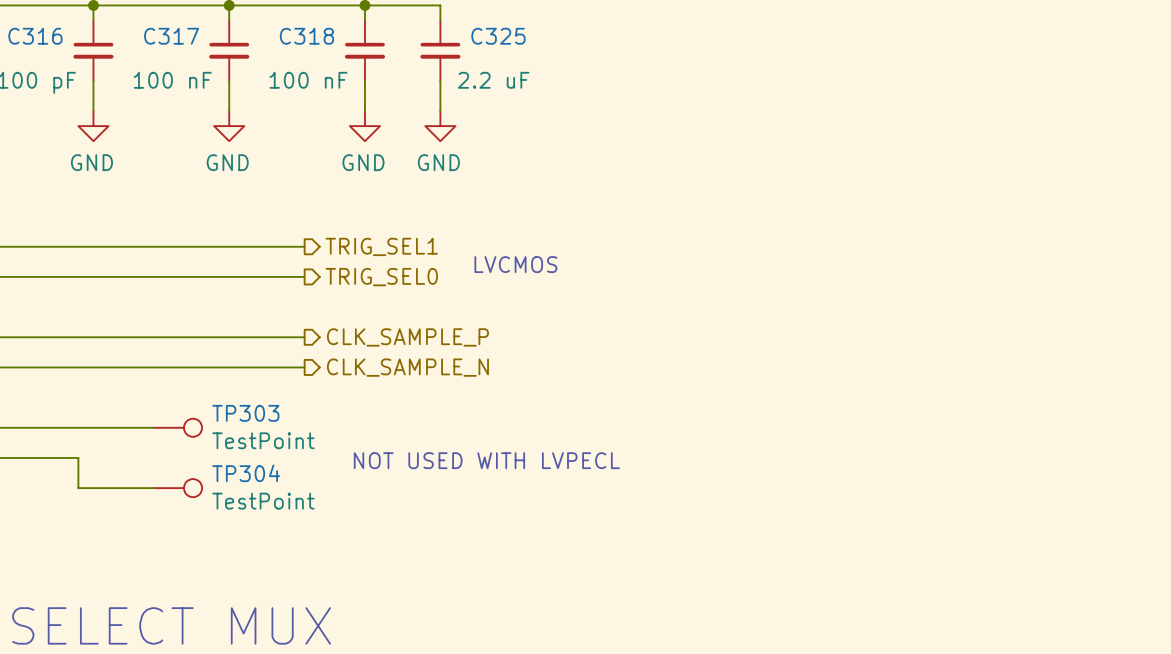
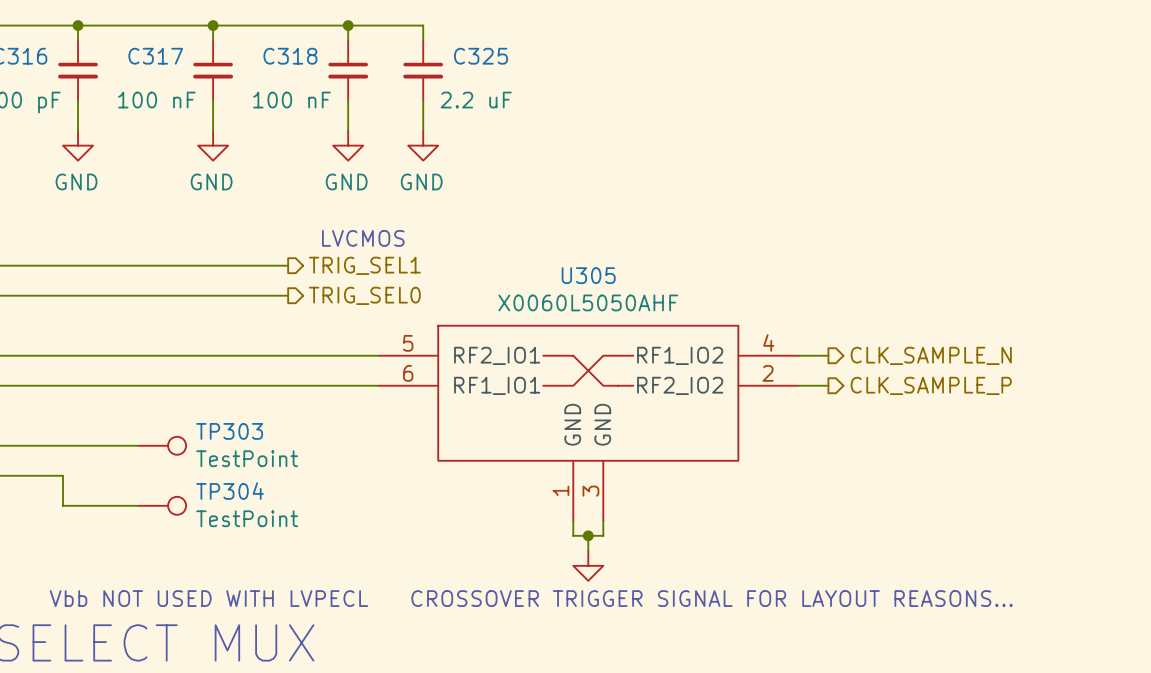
text position: LVCMOS (515, 264) -> LVCMOS (363, 238)
wire: none -> (288, 355) (378, 355)
hierarchical label: CLK_SAMPLE_P (407, 337) -> none
wire: none -> (798, 355) (828, 355)
hierarchical label: none -> CLK_SAMPLE_N (931, 355)
wire: none -> (288, 385) (378, 385)
hierarchical label: CLK_SAMPLE_N (407, 367) -> none
wire: none -> (798, 385) (828, 385)
hierarchical label: none -> CLK_SAMPLE_P (931, 385)
U305: none -> X0060L5050AHF (588, 423)
text: NOT USED WITH LVPECL (486, 460) -> none
wire: none -> (573, 520) (573, 535) (603, 535) (603, 520)
wire: none -> (588, 535) (588, 550)
junction: none -> (588, 535)
power symbol: none -> (588, 565)
text: none -> Vbb NOT USED WITH LVPECL (208, 598)
text: none -> CROSSOVER TRIGGER SIGNAL FOR LAYOUT REASONS... (712, 598)

